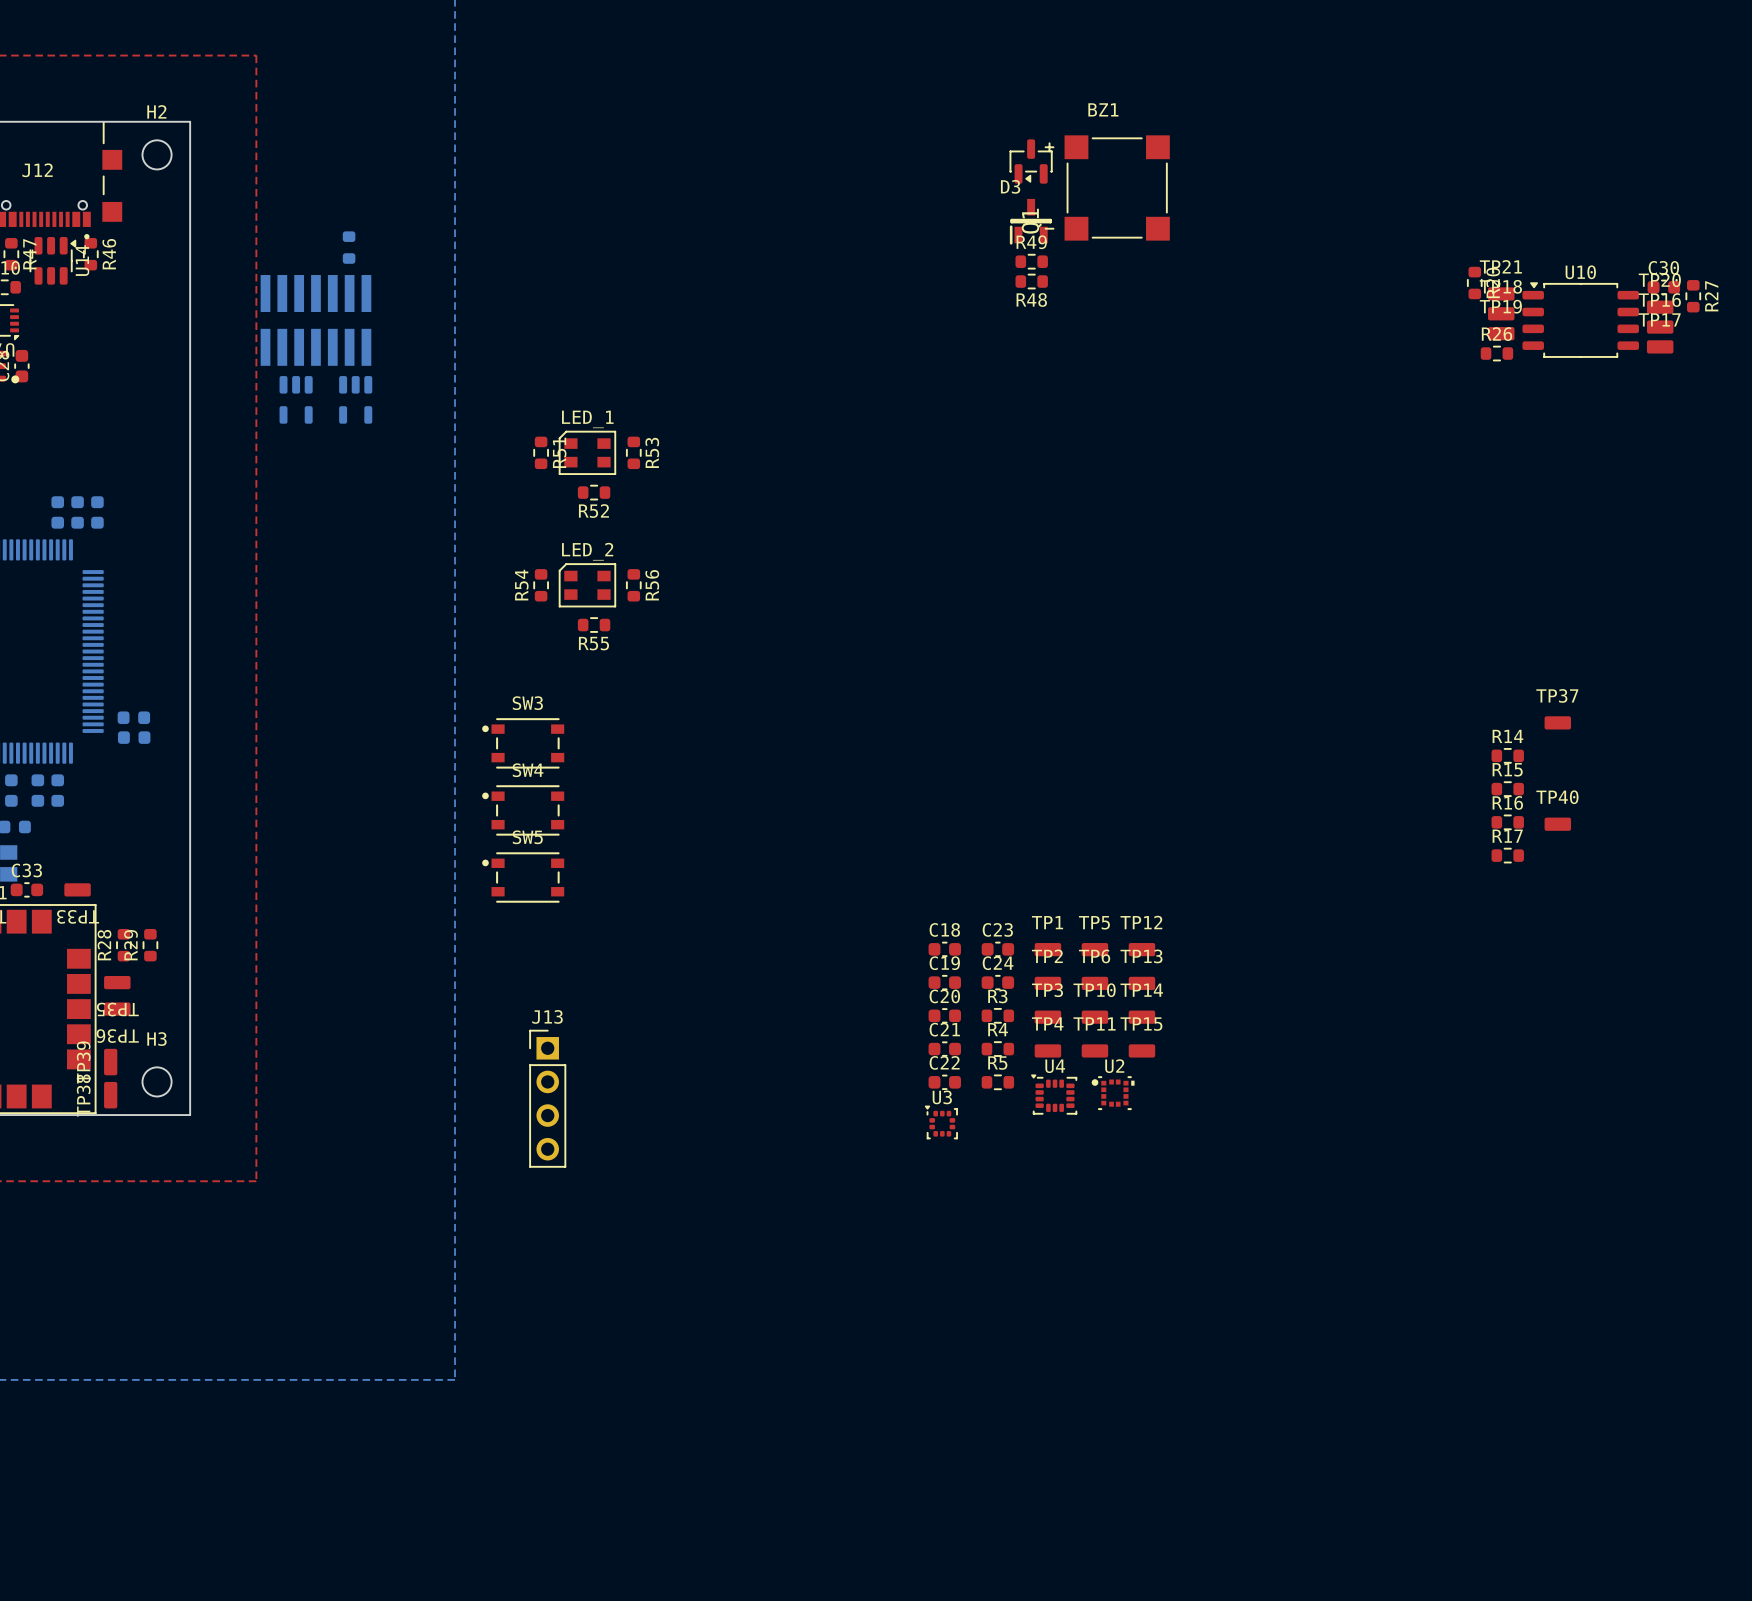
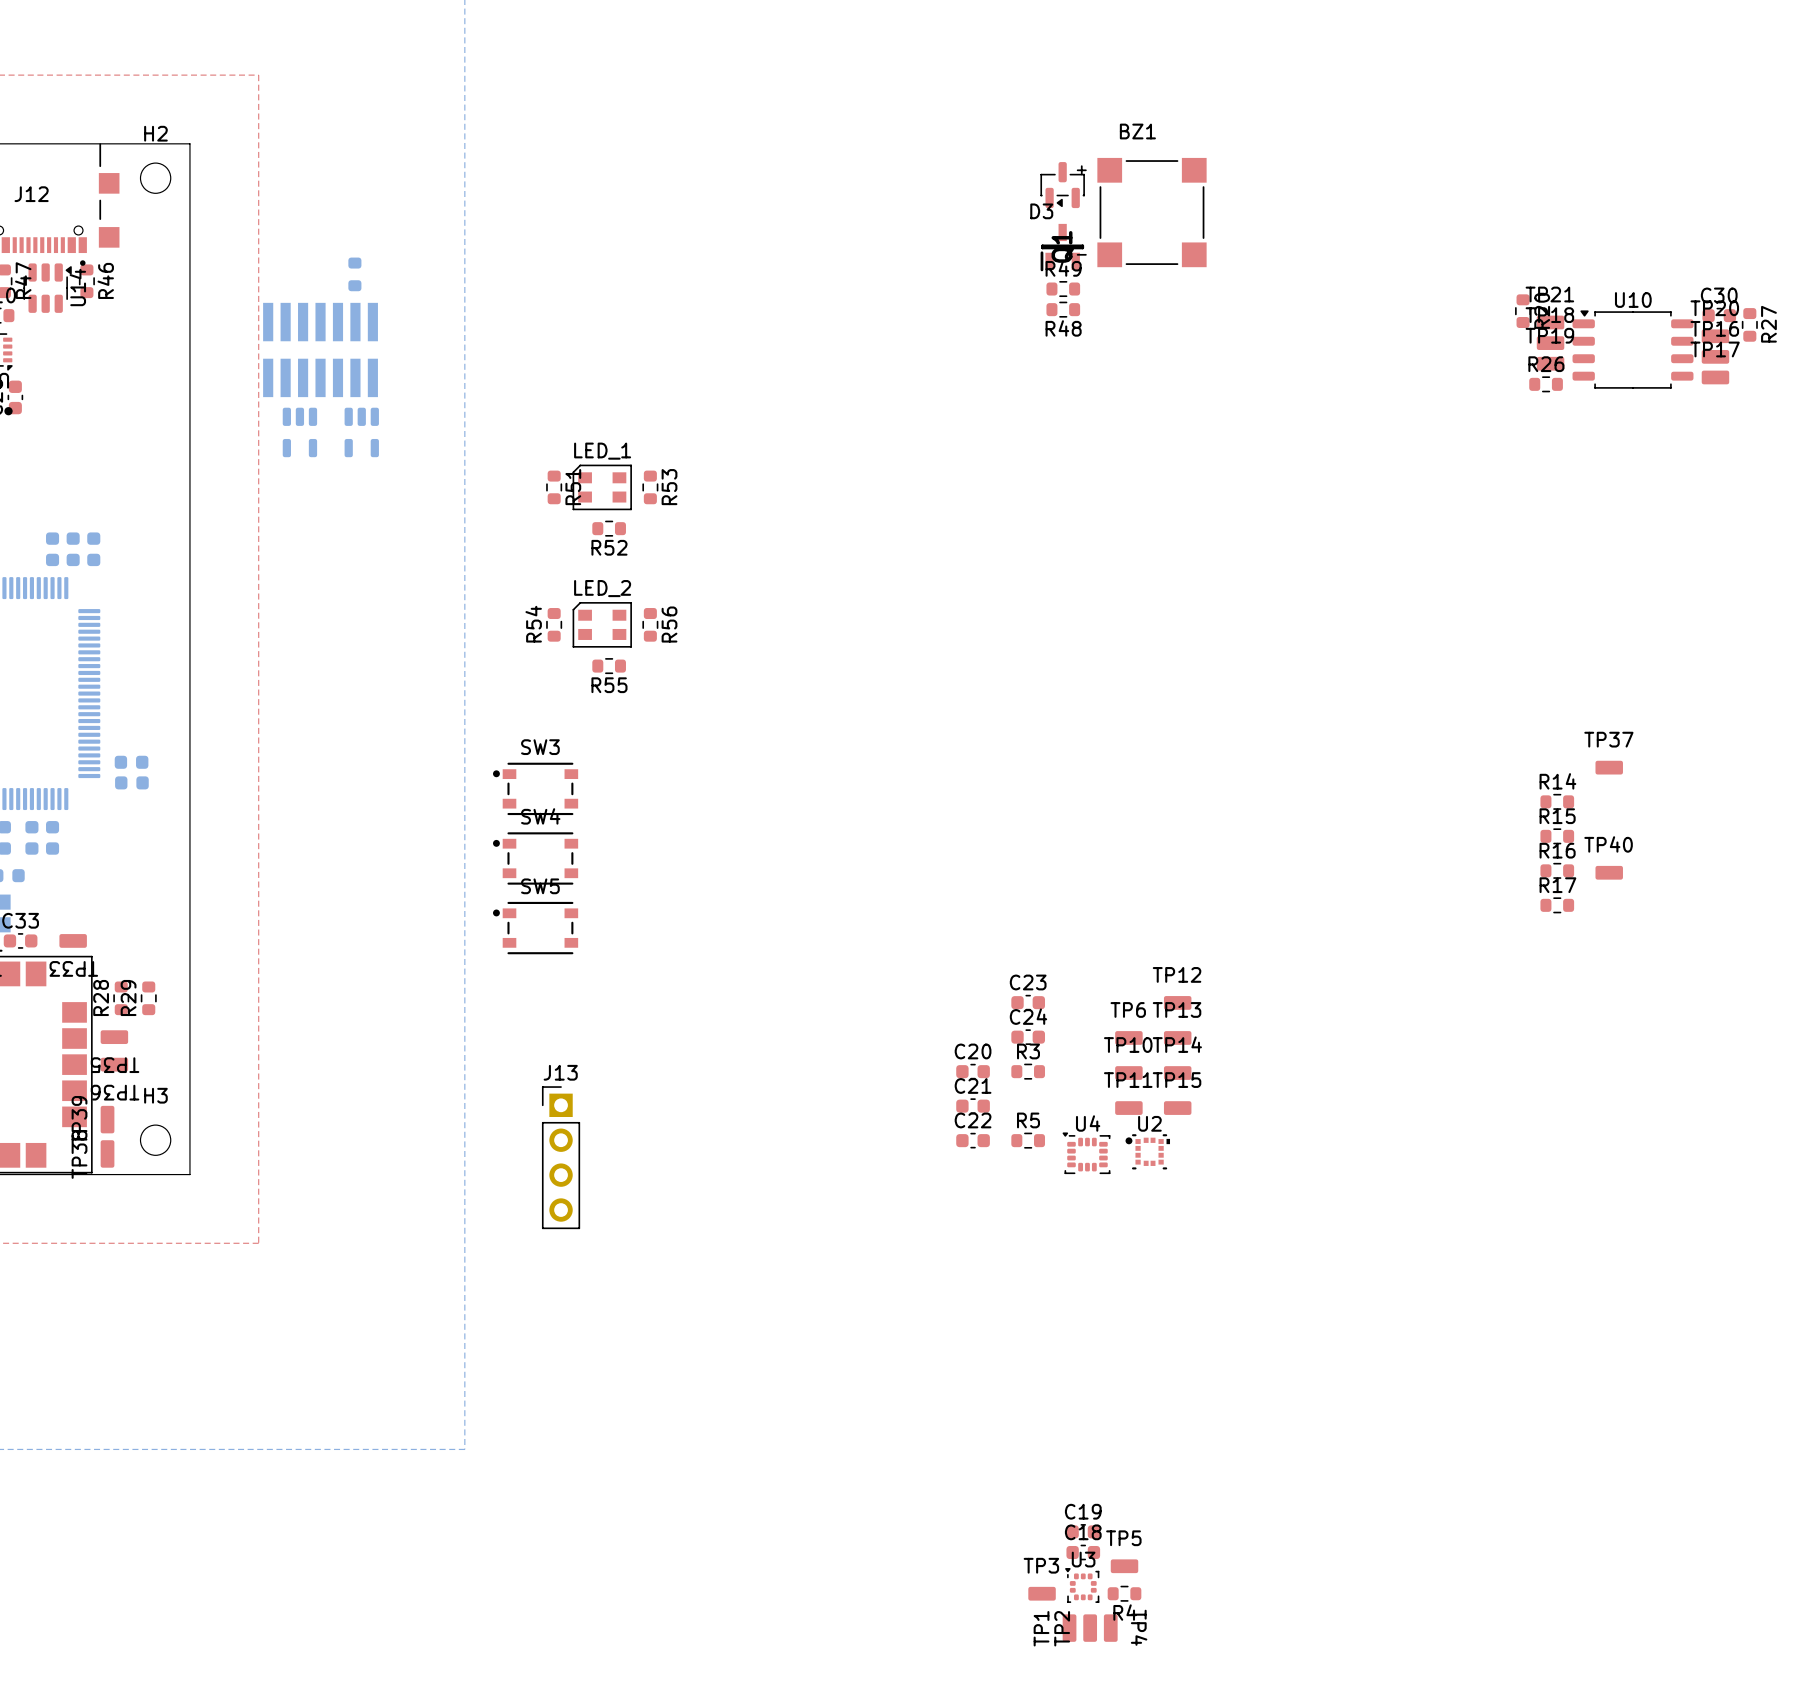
TP1 name position: TP1 (1047, 922) -> TP1 (1041, 1628)
C18 position: (944, 949) -> (1083, 1552)
TP1 rotation: 0° (1047, 949) -> 90° clockwise (1069, 1628)
TP1 position: (1047, 949) -> (1069, 1628)
TP5 position: (1094, 949) -> (1124, 1566)
TP2 name position: TP2 (1047, 956) -> TP2 (1062, 1628)
C19 position: (944, 982) -> (1083, 1531)
TP2 rotation: 0° (1047, 983) -> 90° clockwise (1090, 1628)
TP2 position: (1047, 983) -> (1090, 1628)
TP3 position: (1047, 1017) -> (1042, 1593)
R4 name position: R4 (998, 1029) -> R4 (1125, 1612)
R4 position: (997, 1049) -> (1124, 1593)
TP4 rotation: 0° (1047, 1050) -> 90° clockwise (1110, 1628)
TP4 position: (1047, 1050) -> (1110, 1628)
U3 position: (941, 1122) -> (1082, 1585)

